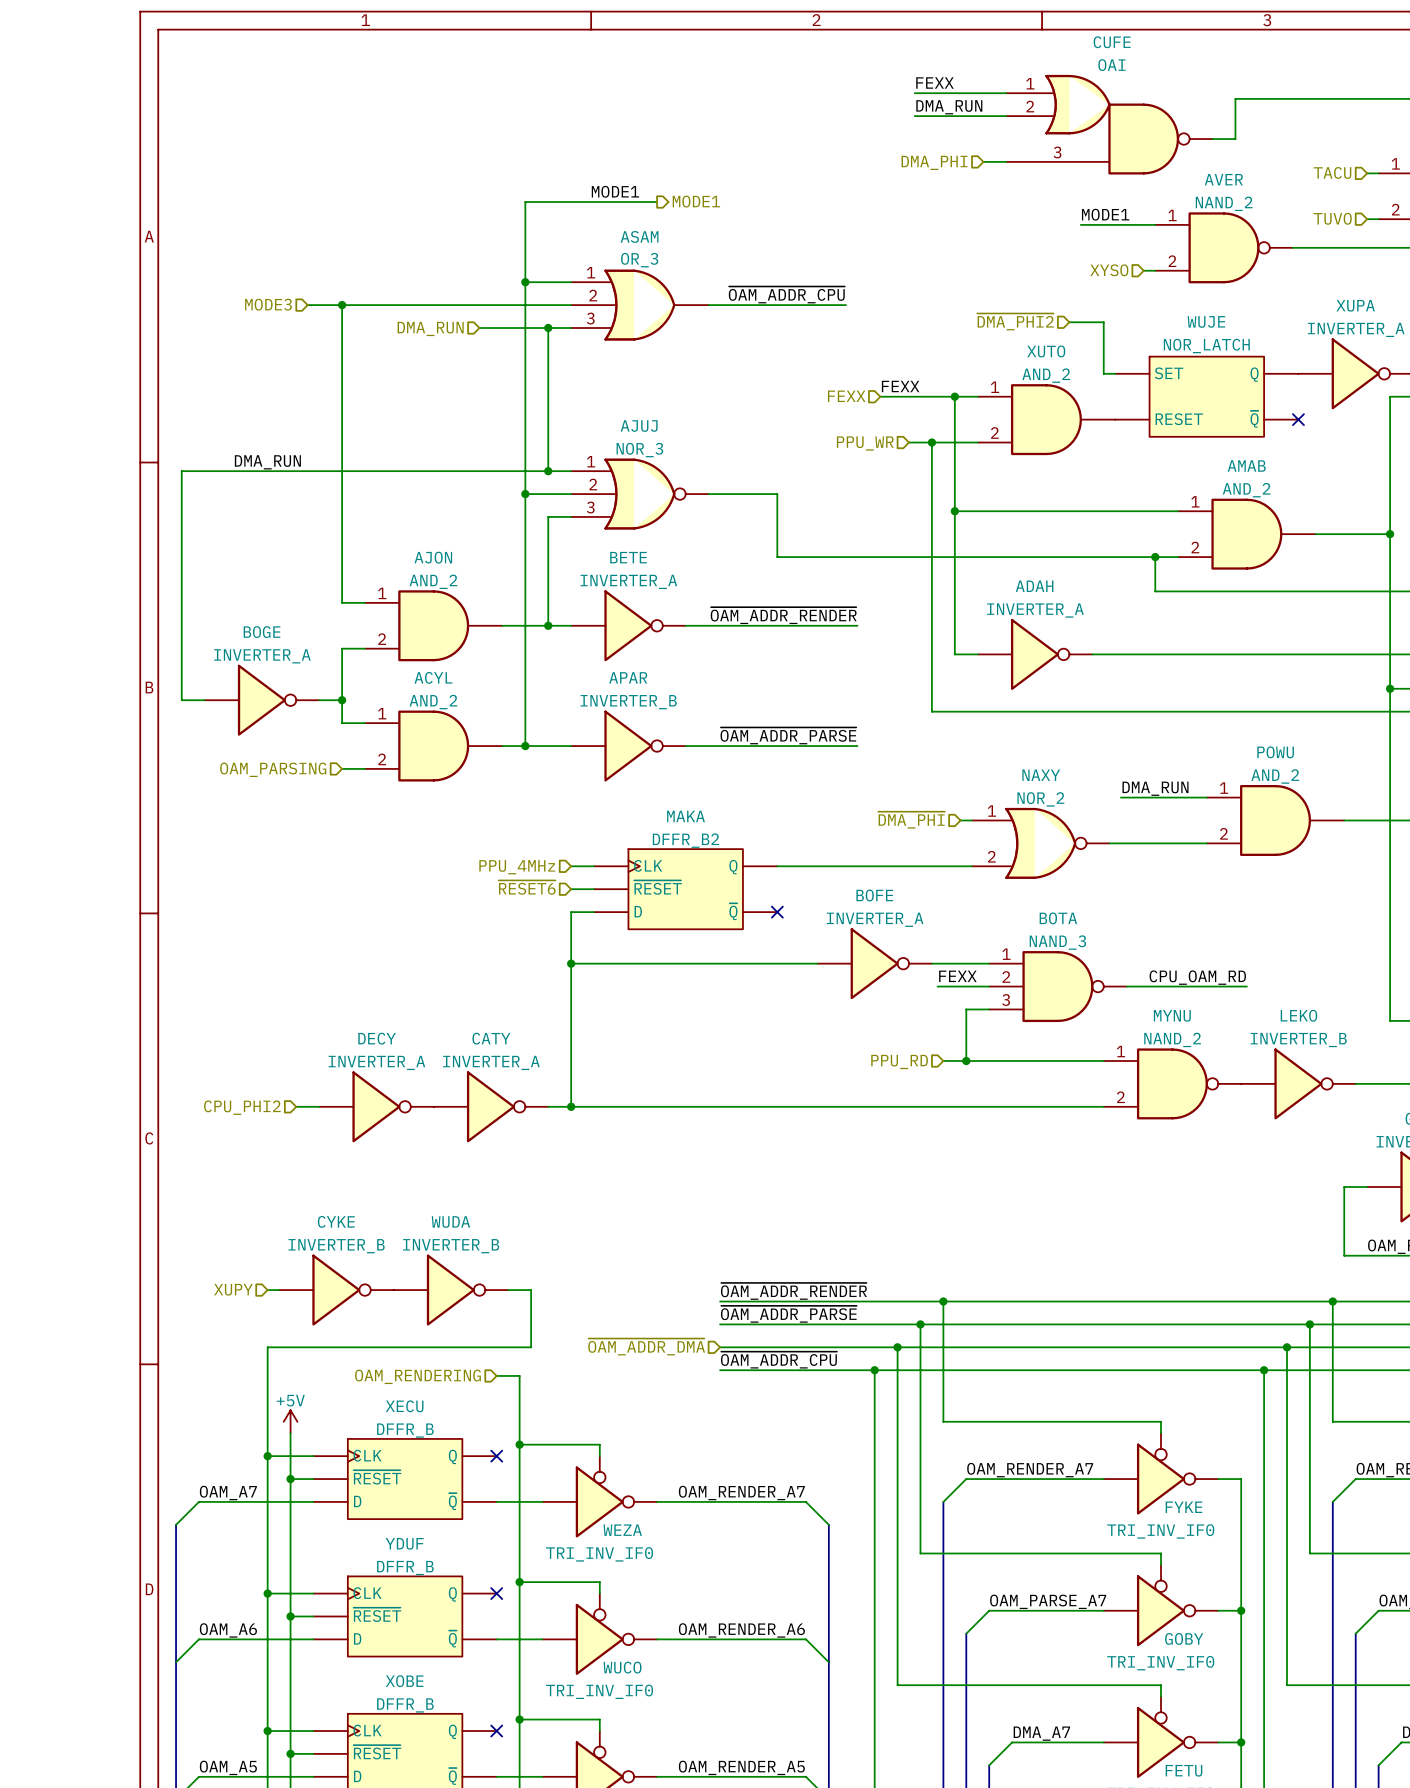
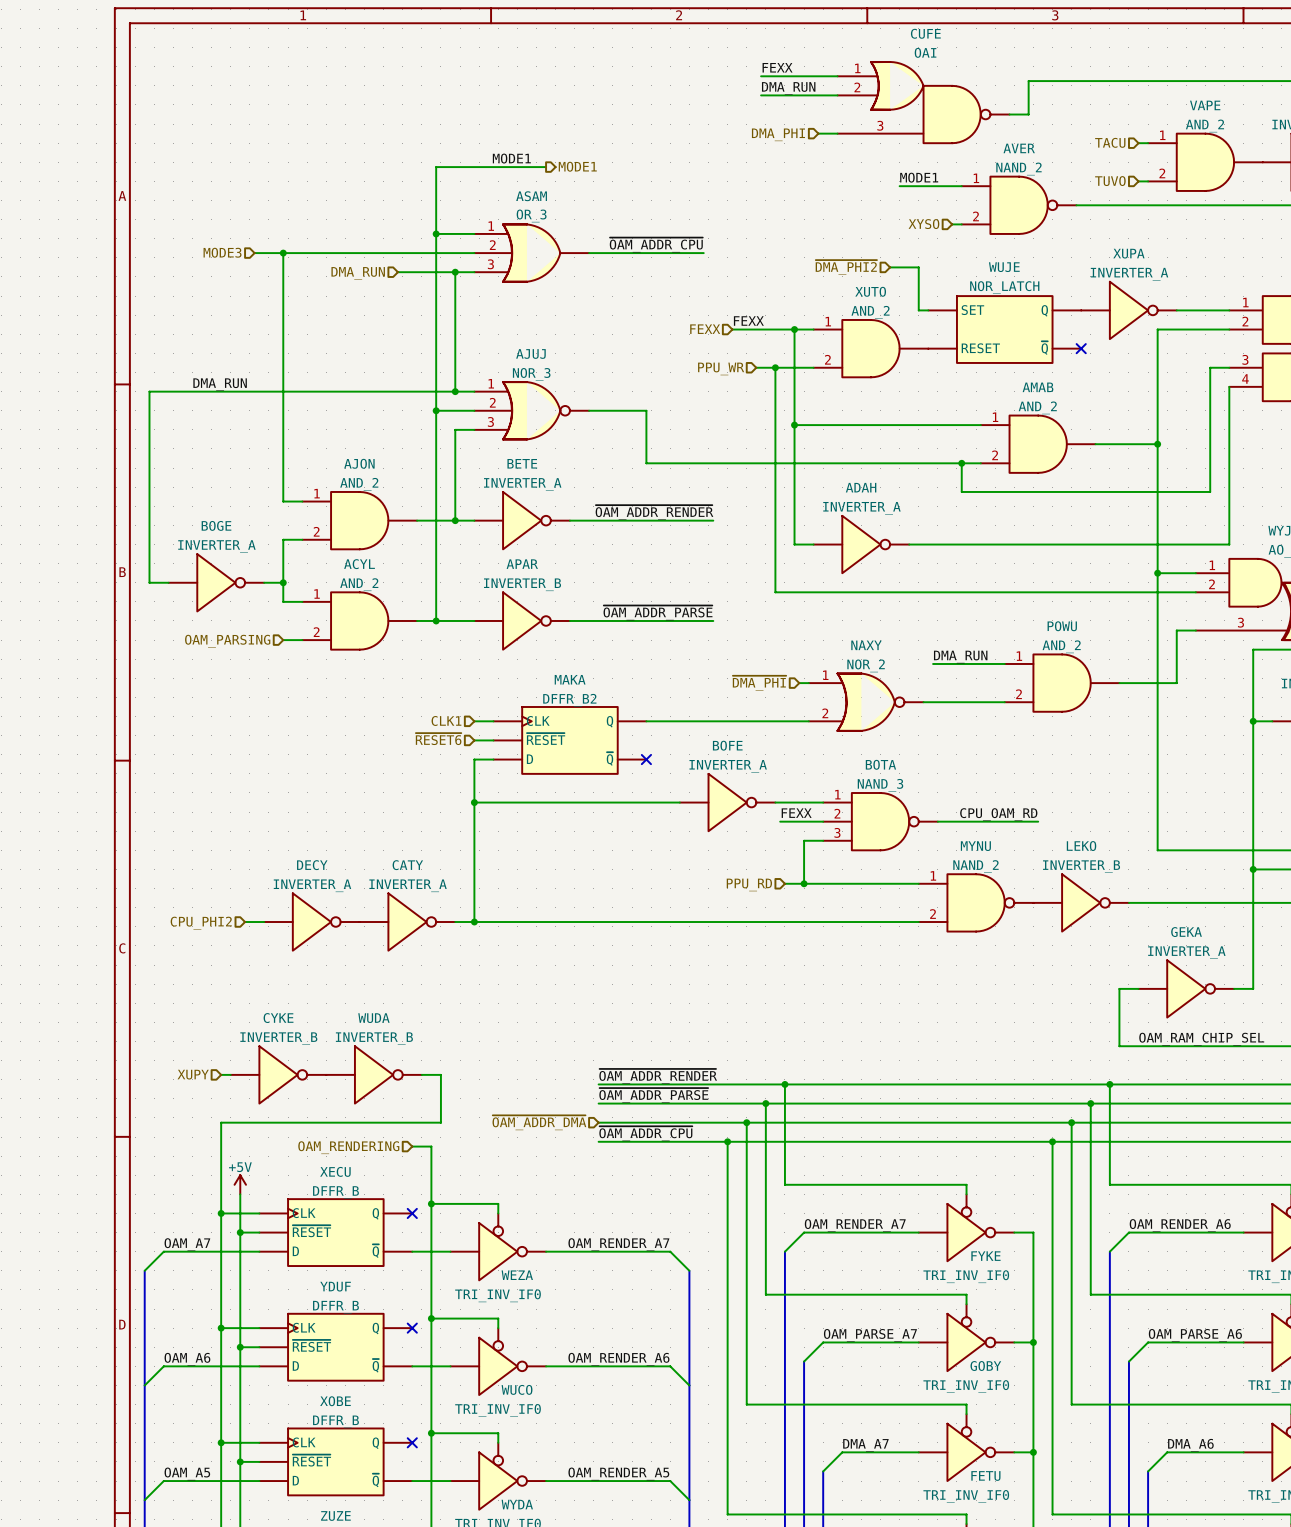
hierarchical label: PPU_4MHz (517, 867) -> CLK1 (446, 720)

